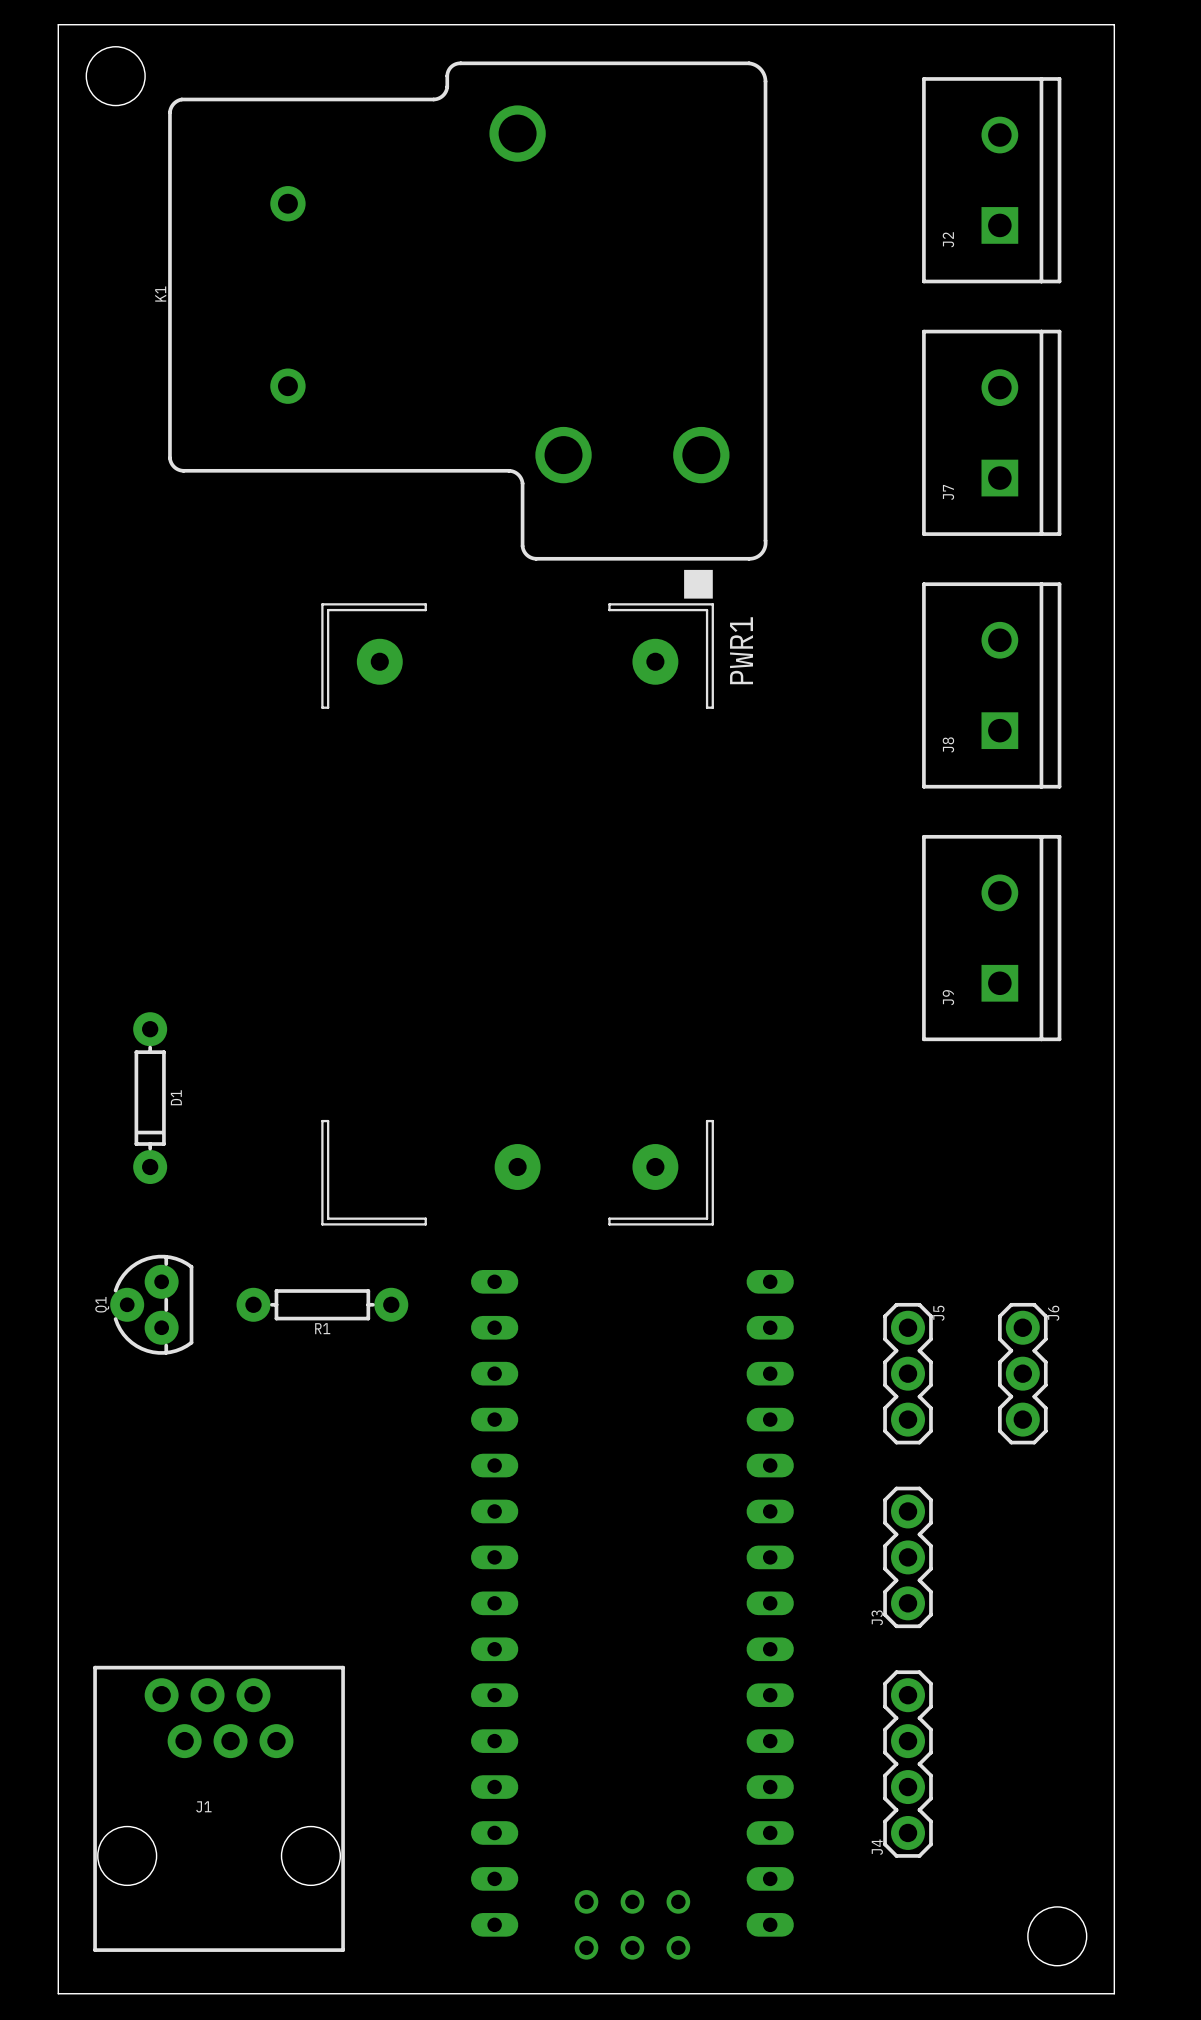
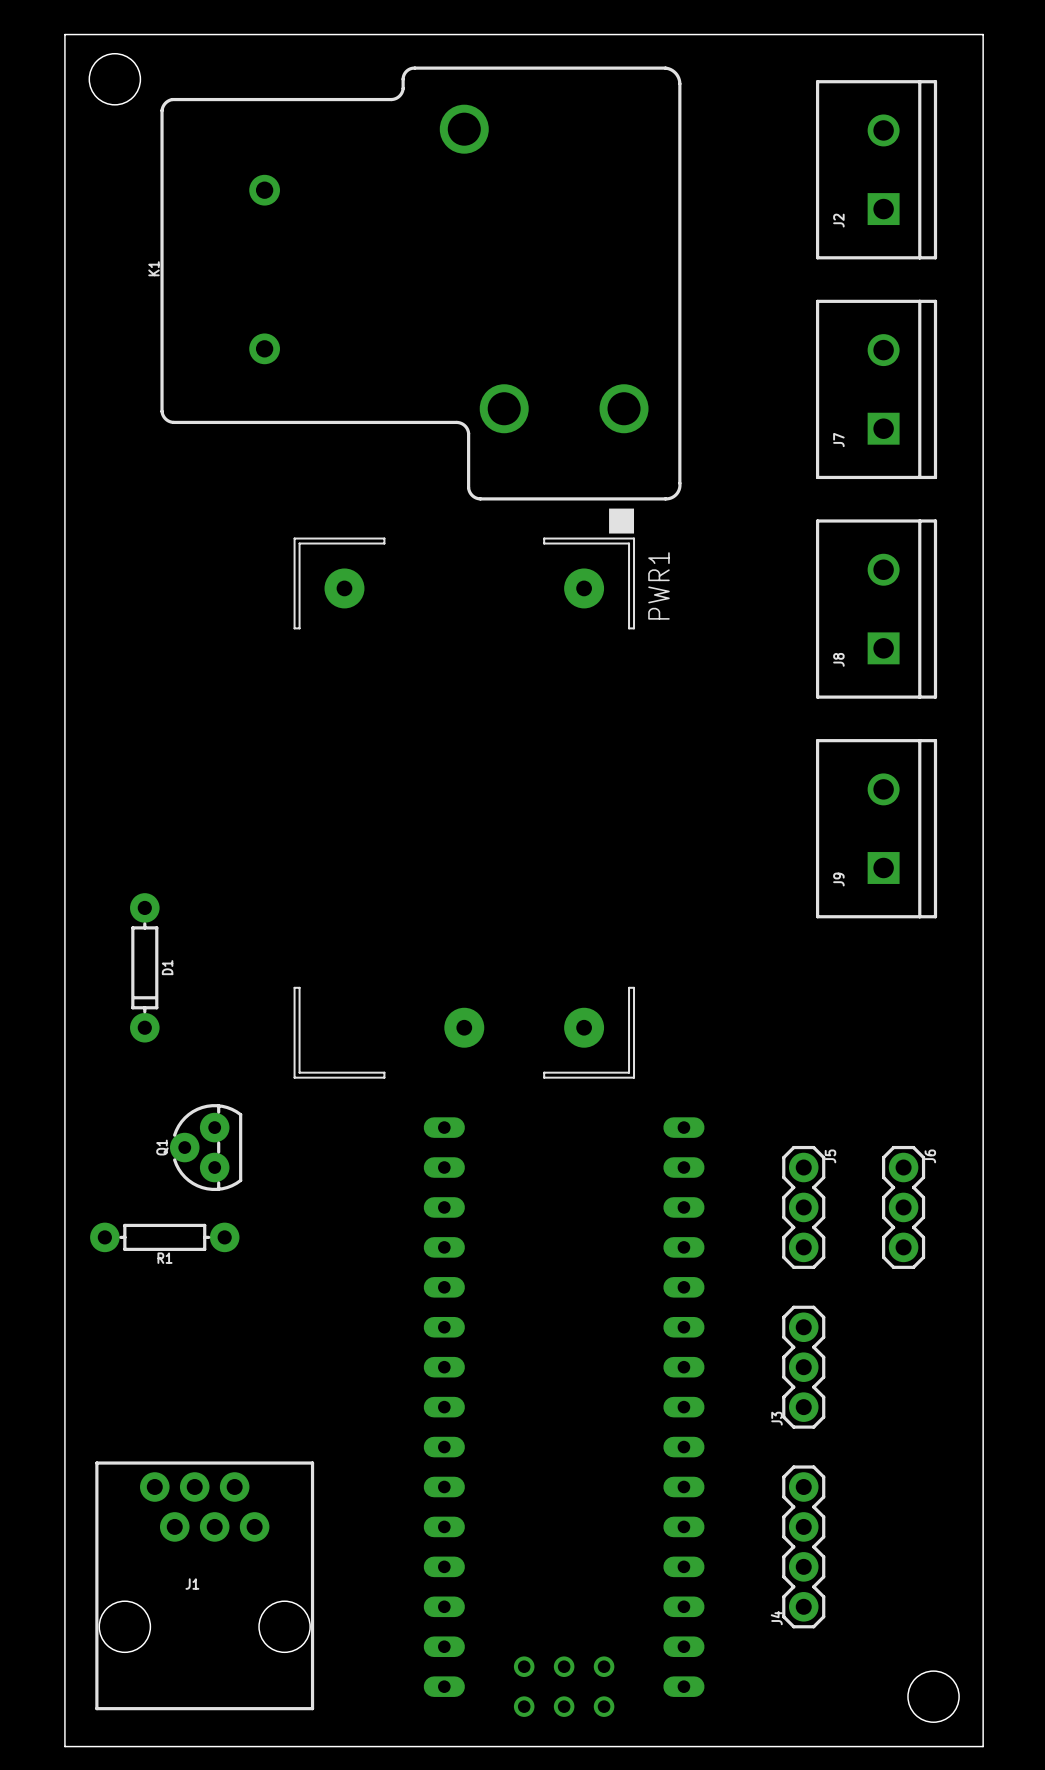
Q1 position: (151, 1304) -> (206, 1147)
R1 position: (322, 1304) -> (164, 1237)

